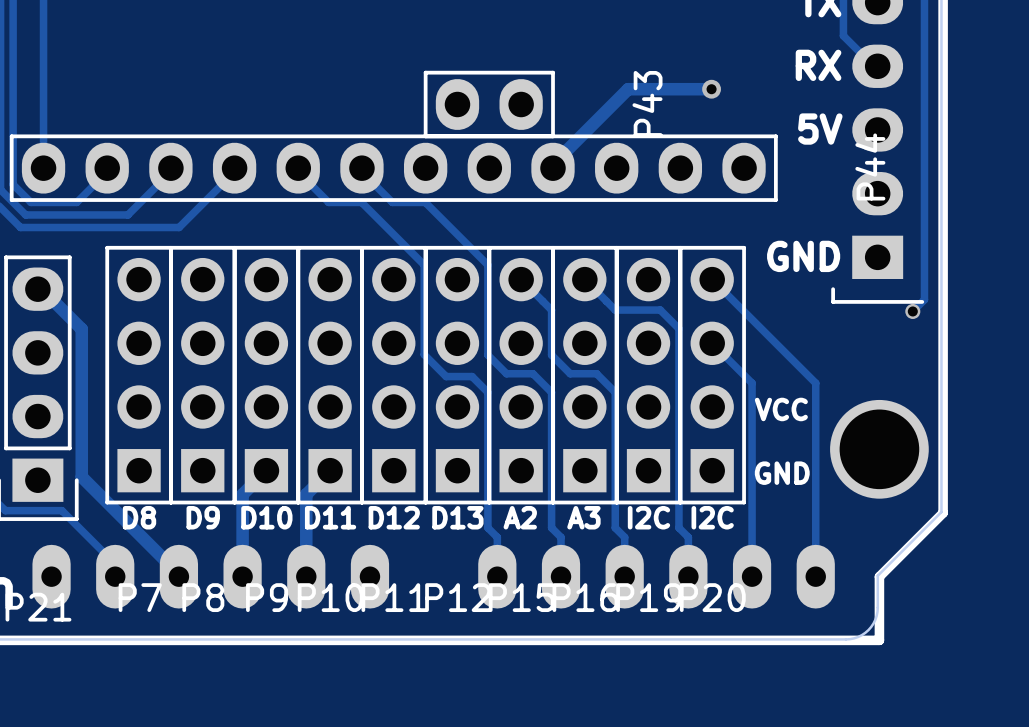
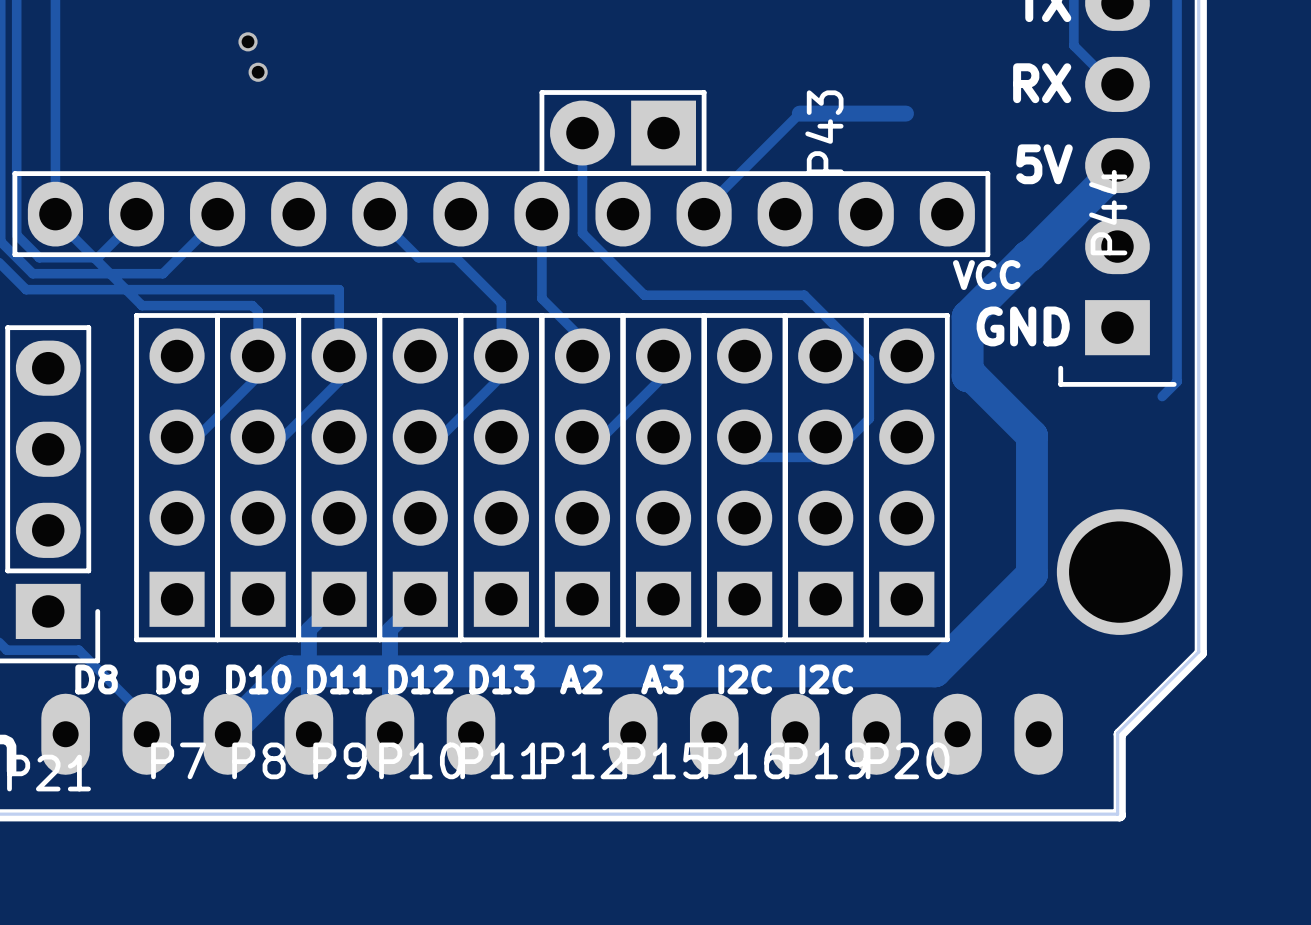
via: none -> (248, 41)
via: none -> (258, 72)
P43 footprint: [423, 70, 555, 139] -> [539, 90, 707, 176]
track width: thick (628, 89) (553, 164) (553, 168) -> thin (799, 113) (704, 209) (704, 214)
via: (711, 89) -> none
track: none -> (582, 133) (582, 233) (644, 295) (804, 295) (869, 360) (869, 418) (830, 457) (744, 457)
track: none -> (55, 214) (55, 219) (142, 305) (252, 305) (258, 311) (258, 376) (177, 457)
track: (361, 168) (361, 172) (392, 202) (425, 202) (487, 265) (487, 355) (506, 373) (532, 373) (551, 392) (551, 527) (561, 537) (561, 576) -> none
track: none -> (541, 214) (541, 298) (582, 339) (582, 376)
track: (234, 172) (179, 227) -> (258, 457) (263, 457) (339, 381) (339, 289) (228, 289)
track: (357, 202) (361, 202) (424, 265) (424, 354) (446, 376) (472, 376) (487, 392) (487, 527) (497, 537) (497, 576) -> (455, 257) (501, 303) (501, 376) (420, 457)
track: (521, 279) (551, 310) (551, 355) (570, 373) (596, 373) (615, 392) (615, 527) (624, 537) (624, 576) -> none
track: (584, 279) (615, 310) (660, 310) (678, 328) (678, 527) (688, 537) (688, 576) -> none
track: (712, 279) (815, 383) (815, 576) -> none
track: (37, 289) (41, 289) (81, 329) (81, 476) (178, 575) -> (1117, 173) (1112, 173) (967, 316) (967, 376) (972, 376) (1031, 435) (1031, 574) (934, 671) (289, 671) (227, 734)
track: none -> (663, 376) (582, 457)
via: (912, 311) -> none
track: (712, 343) (752, 383) (752, 576) -> none
text position: VCC (781, 409) -> VCC (986, 275)
text: GND (782, 473) -> none
text position: D8 (139, 517) -> D8 (96, 679)
text position: D9 (203, 517) -> D9 (177, 679)
text position: D10 (266, 517) -> D10 (258, 679)
text position: D11 (330, 517) -> D11 (339, 679)
text position: D12 (394, 517) -> D12 (420, 679)
text position: D13 (457, 517) -> D13 (501, 679)
text position: A2 (520, 517) -> A2 (581, 679)
text position: A3 (583, 517) -> A3 (662, 679)
text position: I2C (648, 517) -> I2C (826, 679)
text position: I2C (712, 517) -> I2C (745, 679)
board edge: (877, 607) (875, 619) (868, 630) (858, 637) (845, 639) -> (1117, 773) (1117, 814) (1077, 814)

